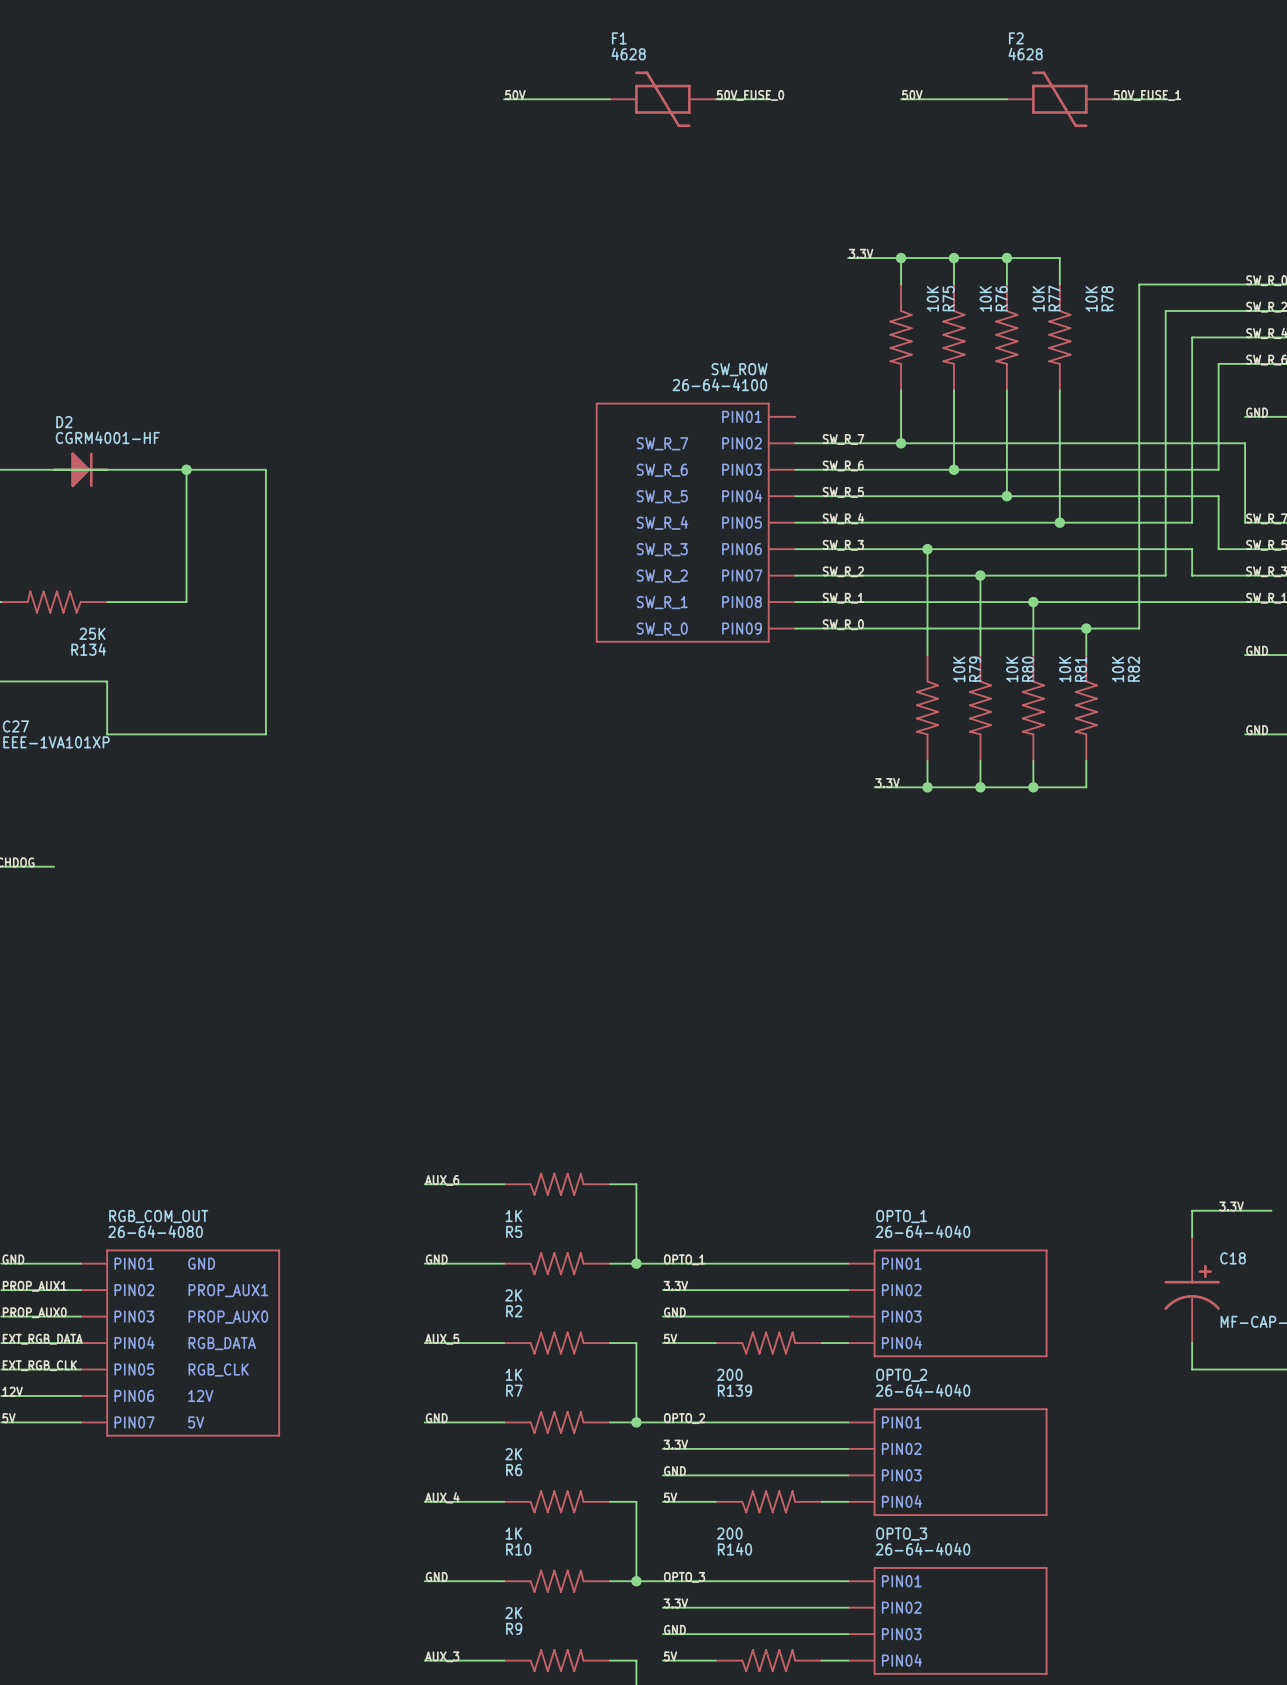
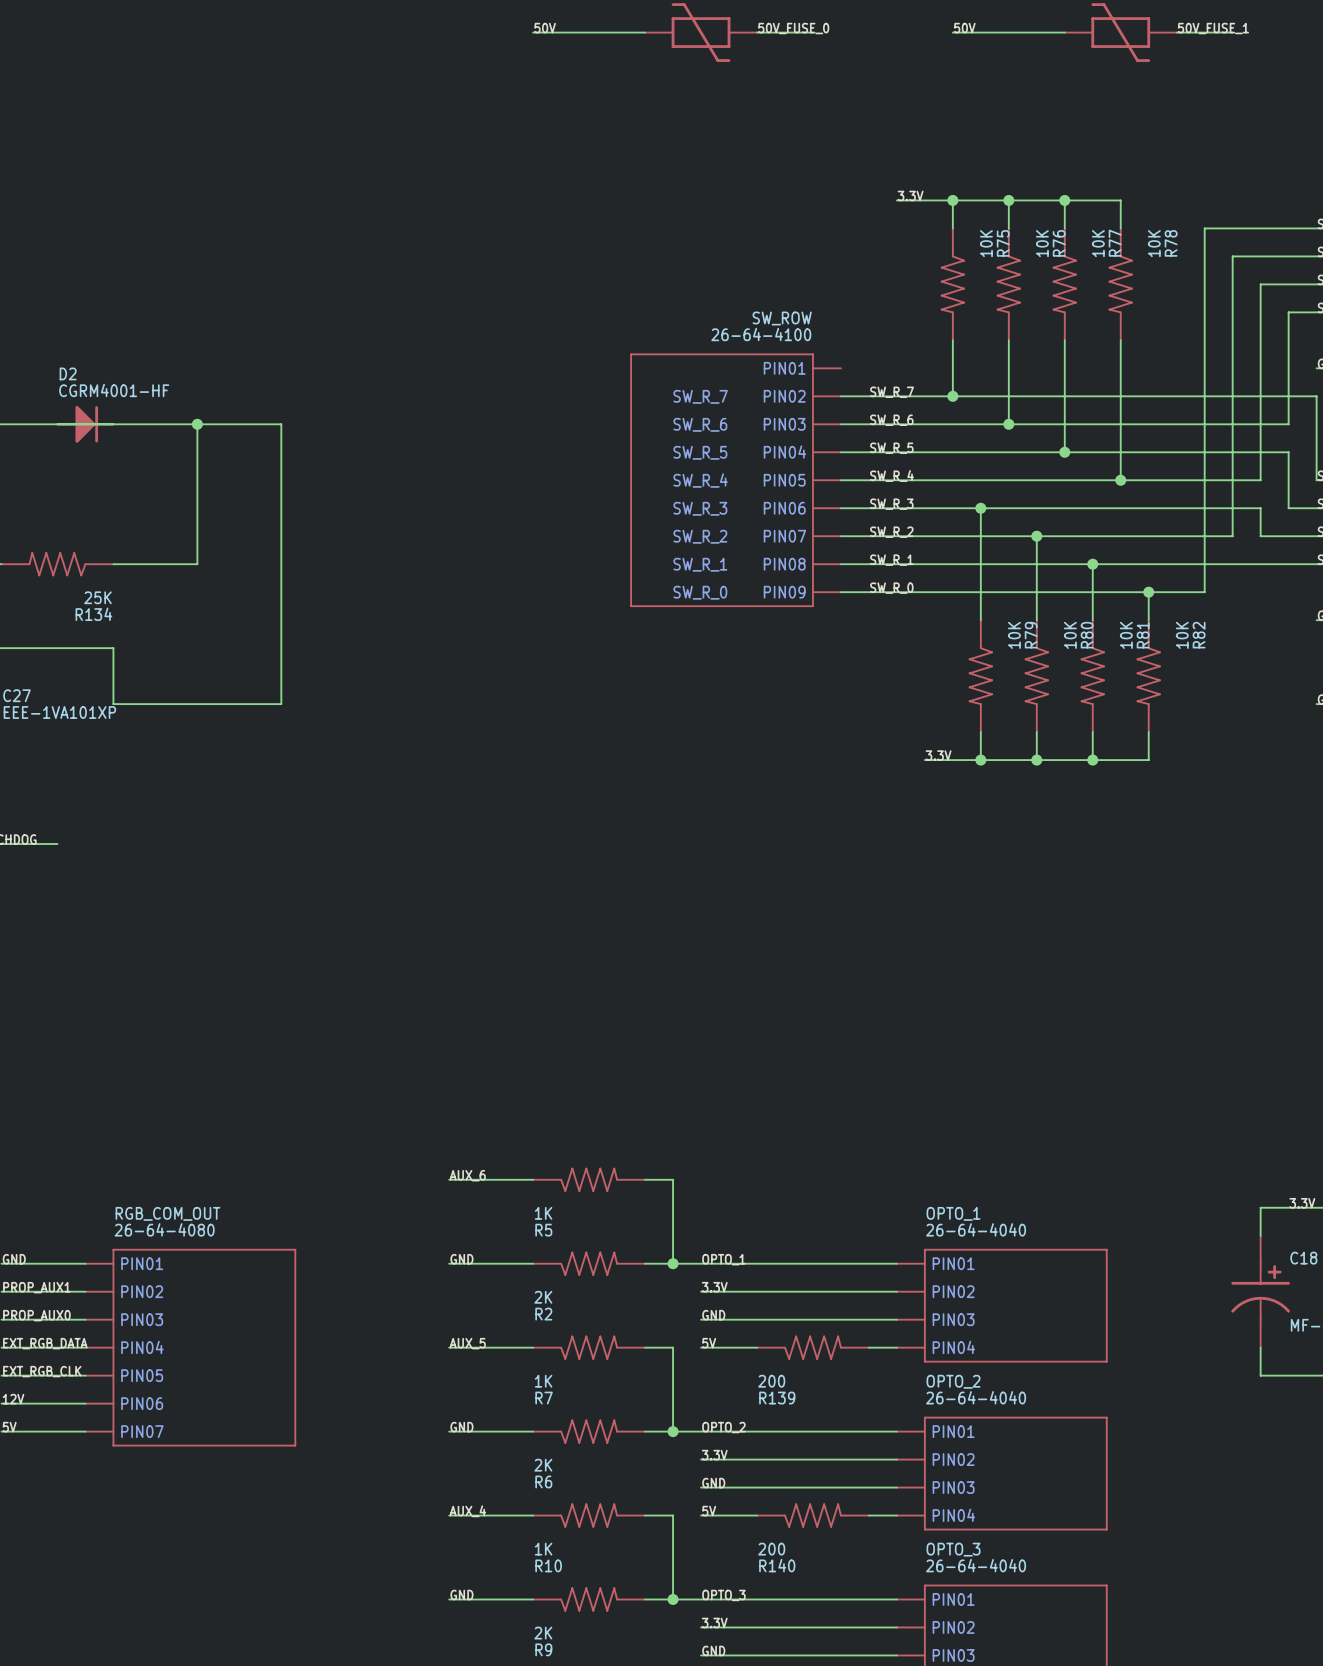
RGB_COM_OUT text: GND (201, 1263) -> none
RGB_COM_OUT text: PROP_AUX1 (228, 1290) -> none
RGB_COM_OUT text: PROP_AUX0 (228, 1317) -> none
RGB_COM_OUT text: RGB_DATA (222, 1343) -> none
RGB_COM_OUT text: RGB_CLK (218, 1370) -> none
RGB_COM_OUT text: 12V (200, 1395) -> none
RGB_COM_OUT text: 5V (196, 1422) -> none

